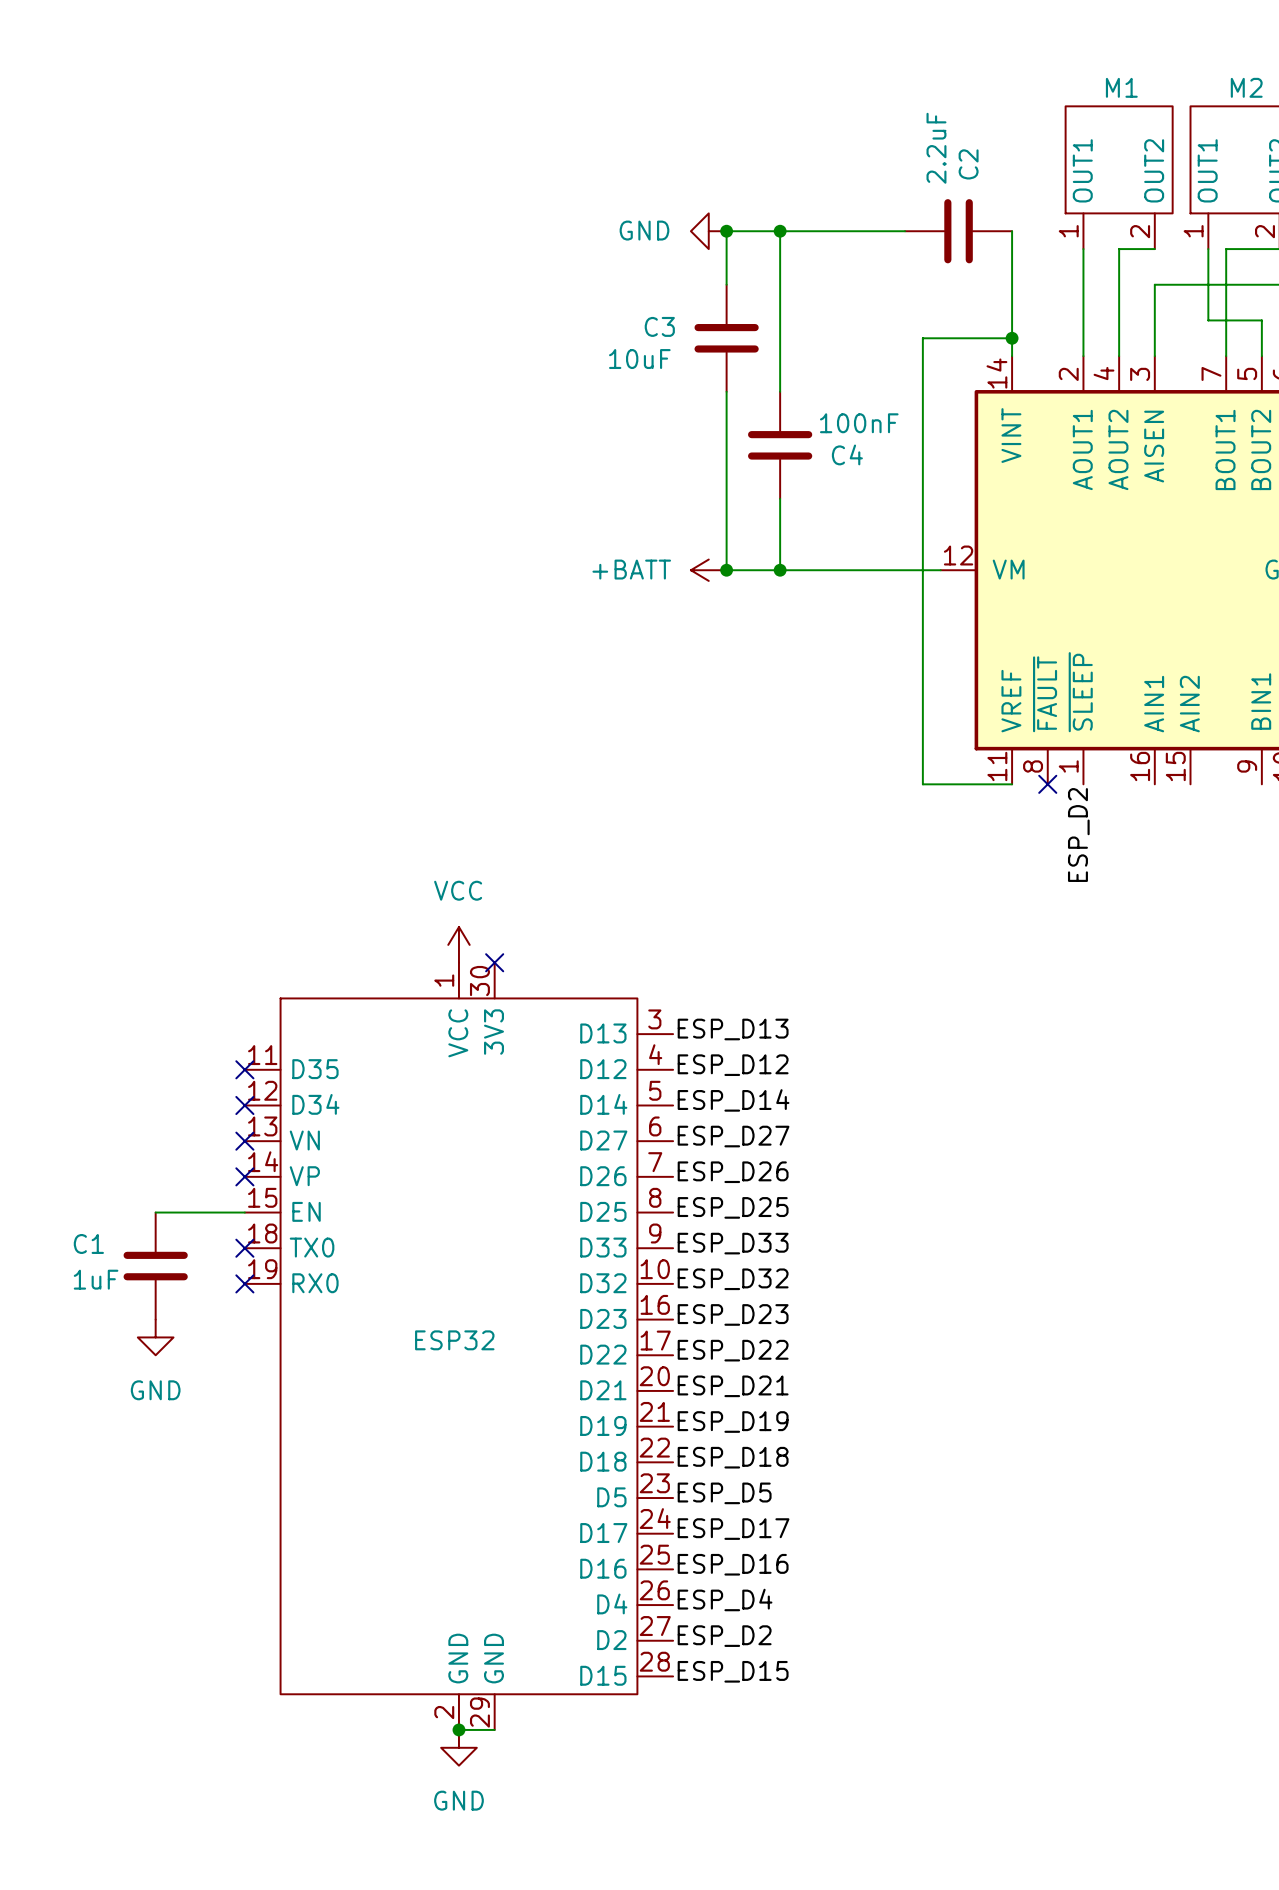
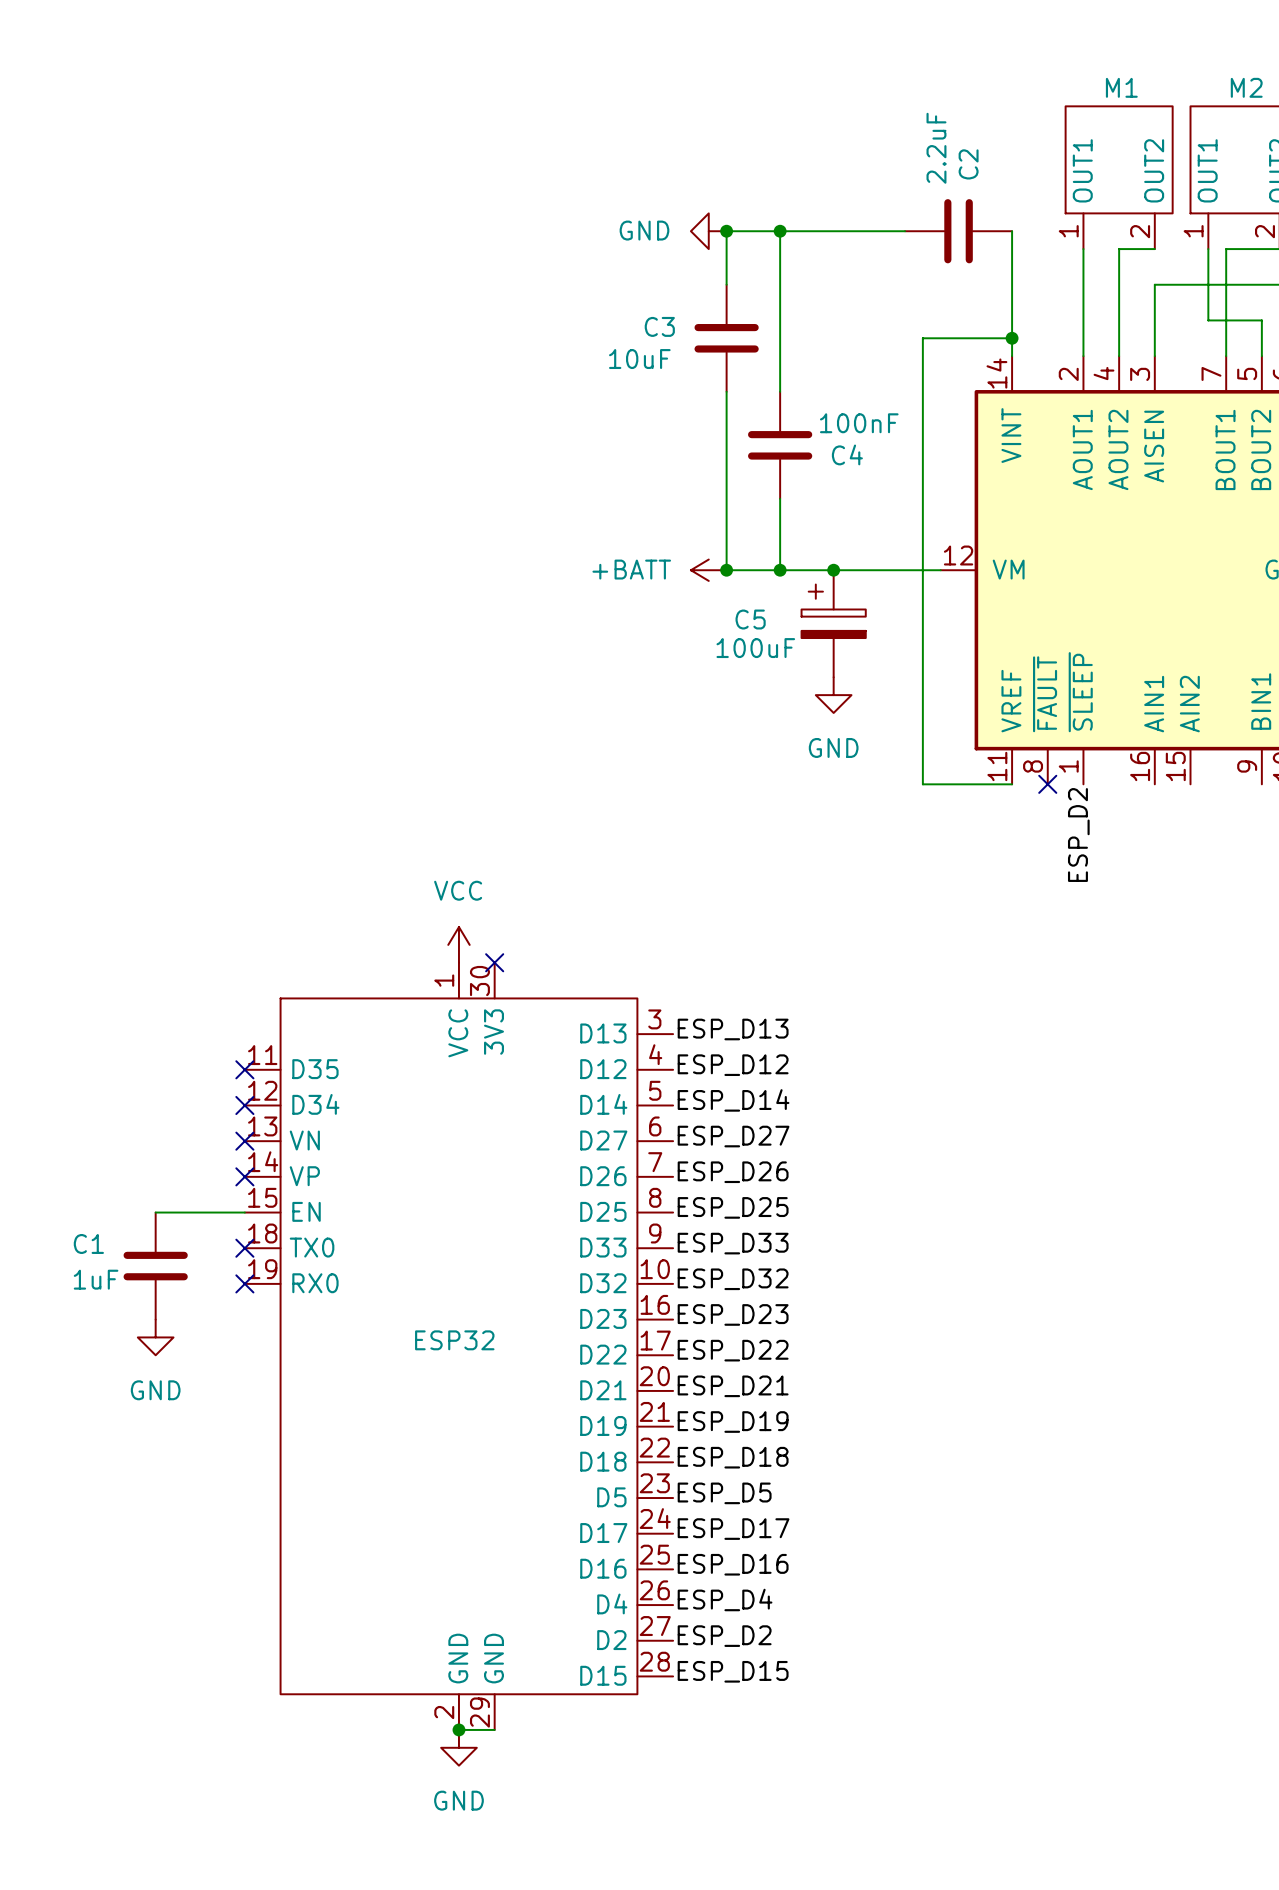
junction: none -> (833, 570)
C5: none -> 100uF (833, 623)
power symbol: none -> GND (833, 695)

